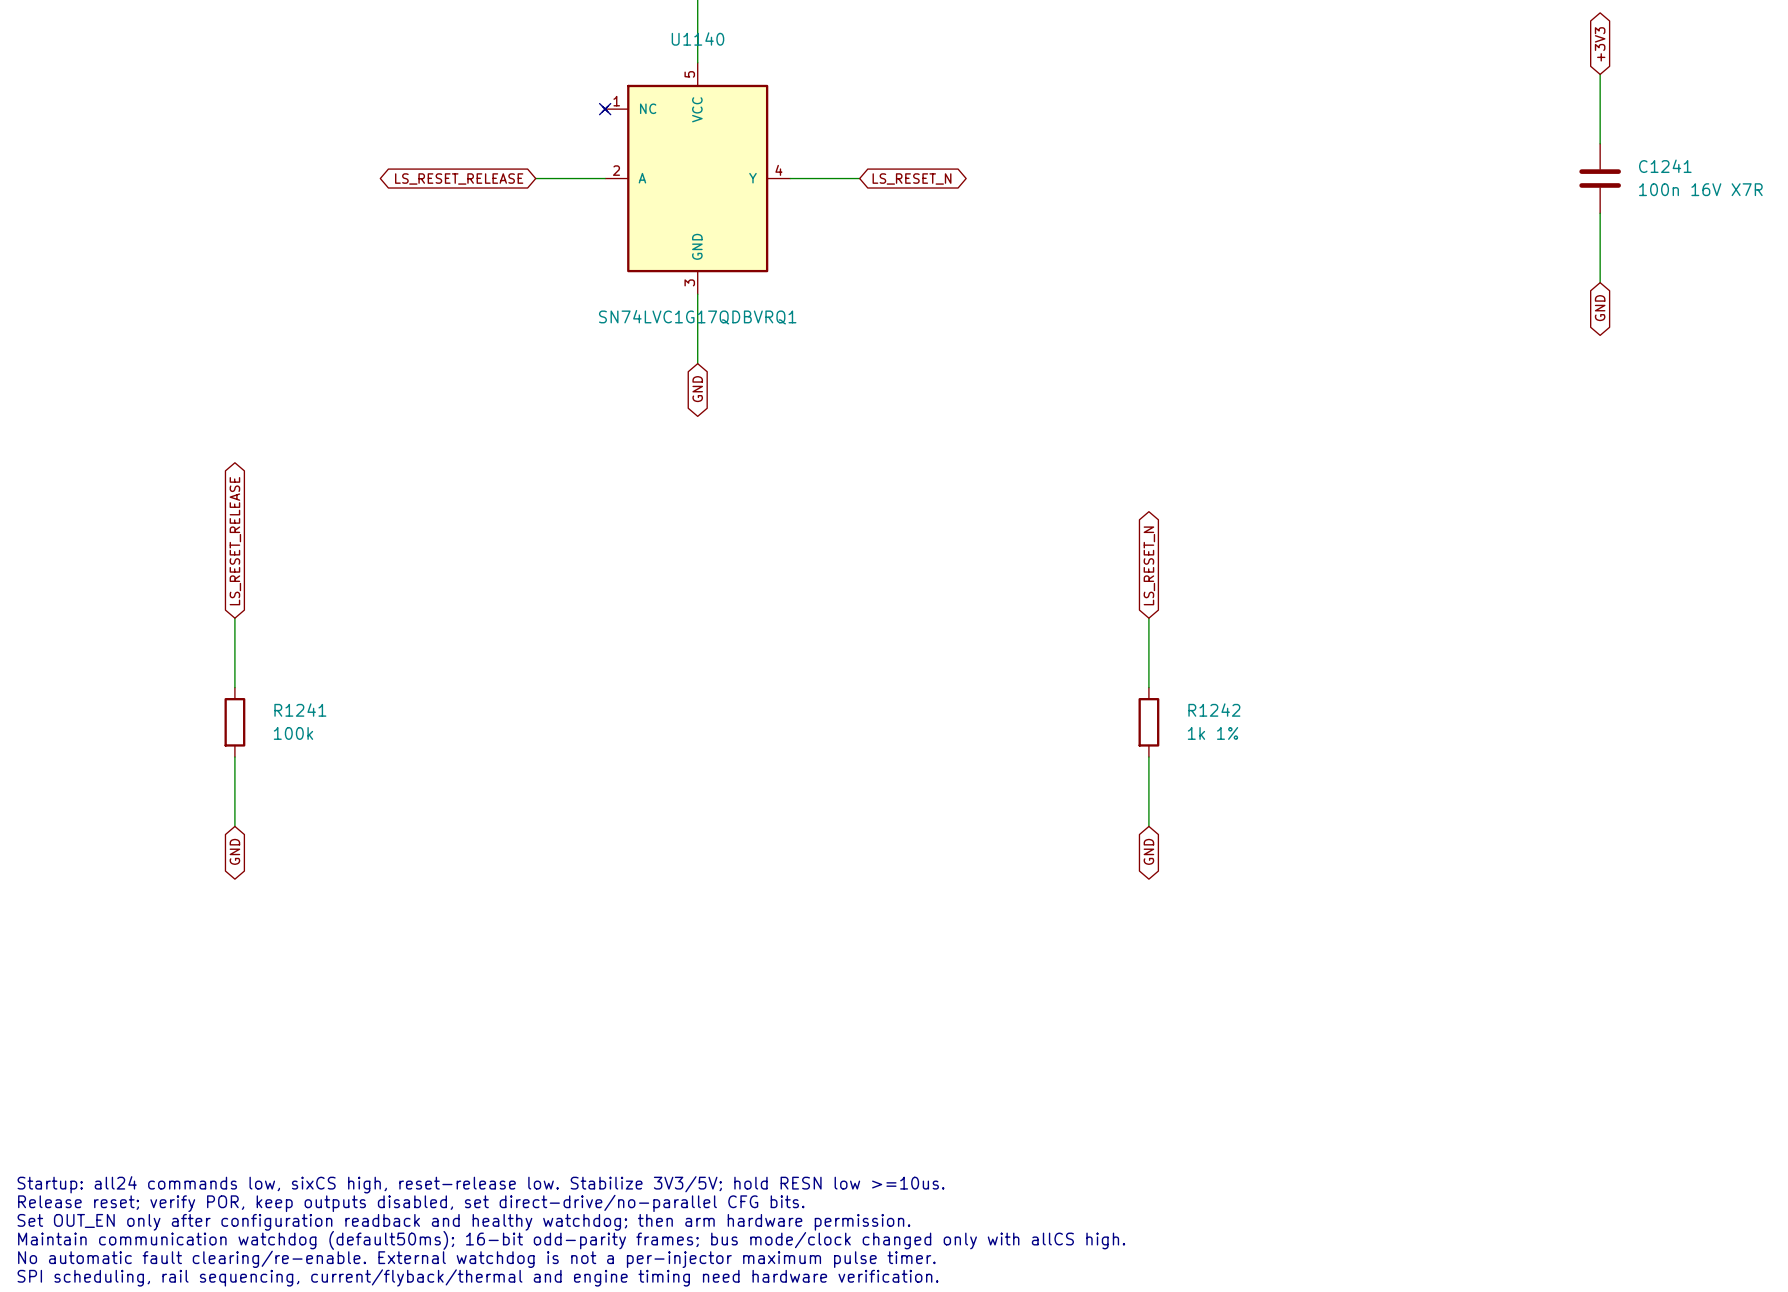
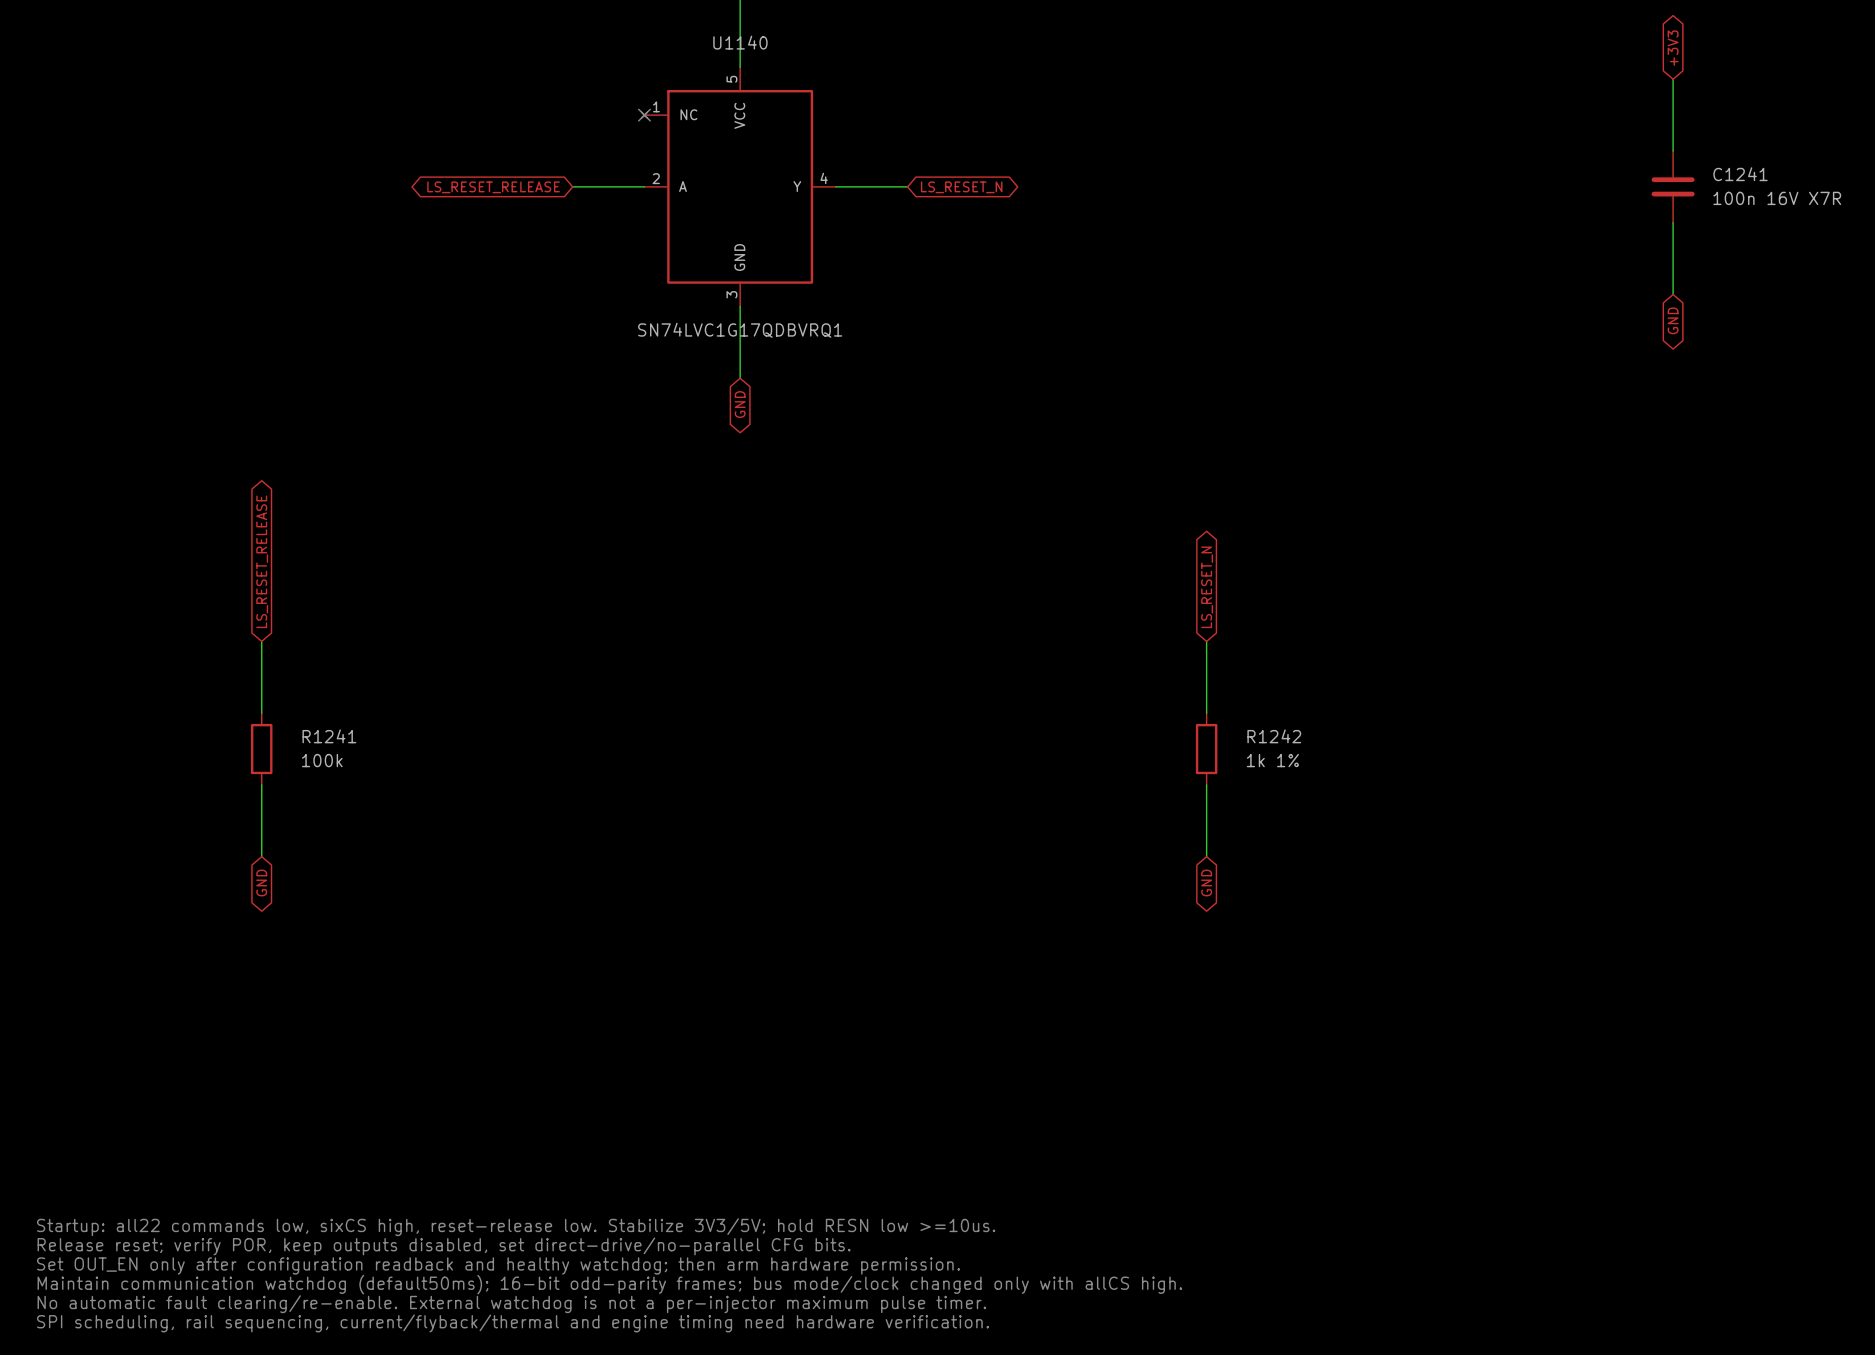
text: Startup: all24 commands low, sixCS high, reset-release low. Stabilize 3V3/5V; hold RESN low >=10us. (481, 1184) -> Startup: all22 commands low, sixCS high, reset-release low. Stabilize 3V3/5V; hold RESN low >=10us. (516, 1227)

